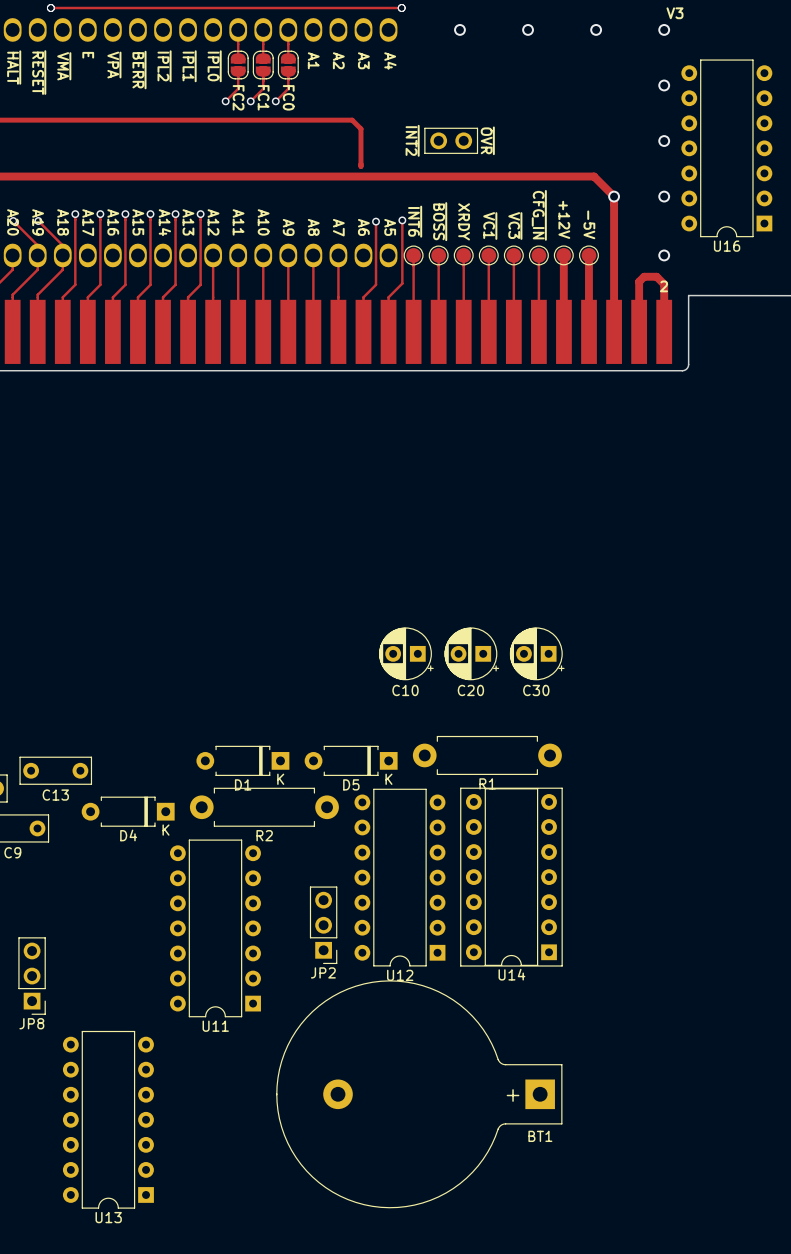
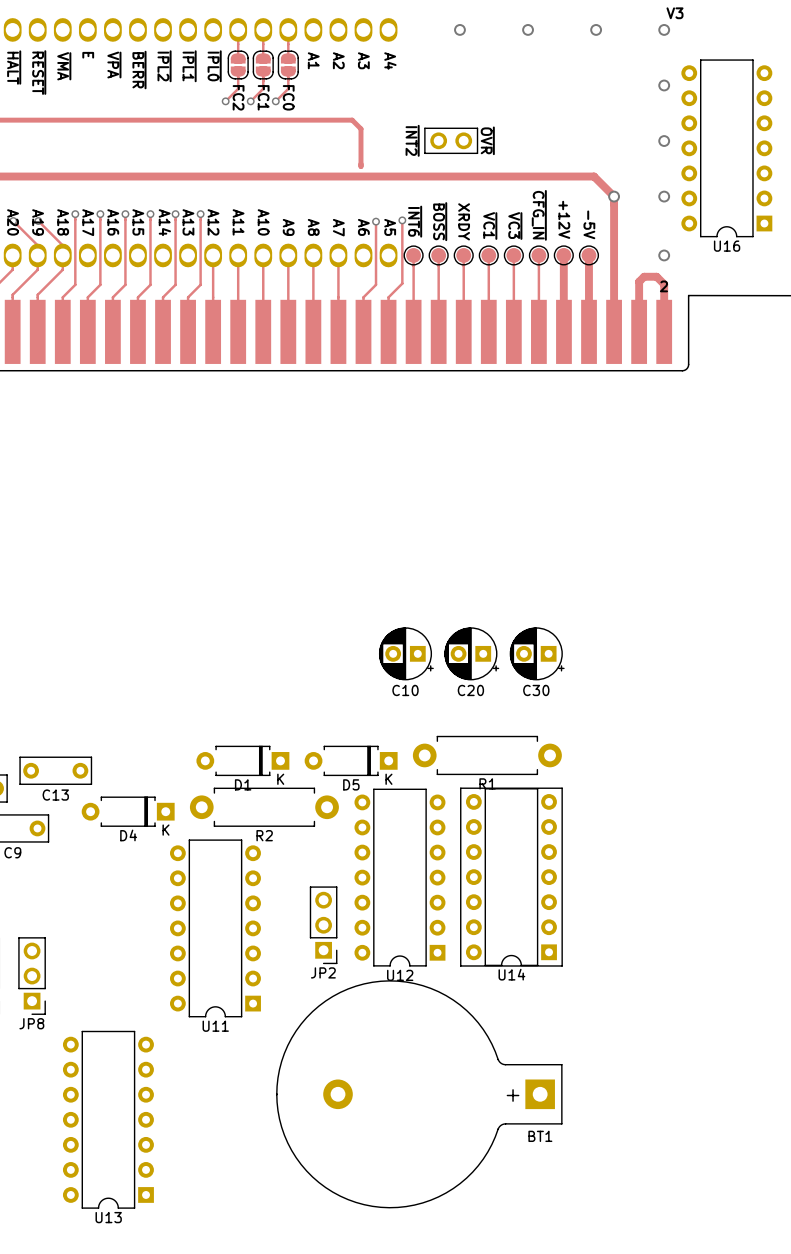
track: (50, 8) (401, 8) -> none
via: (50, 8) -> none
via: (401, 8) -> none

